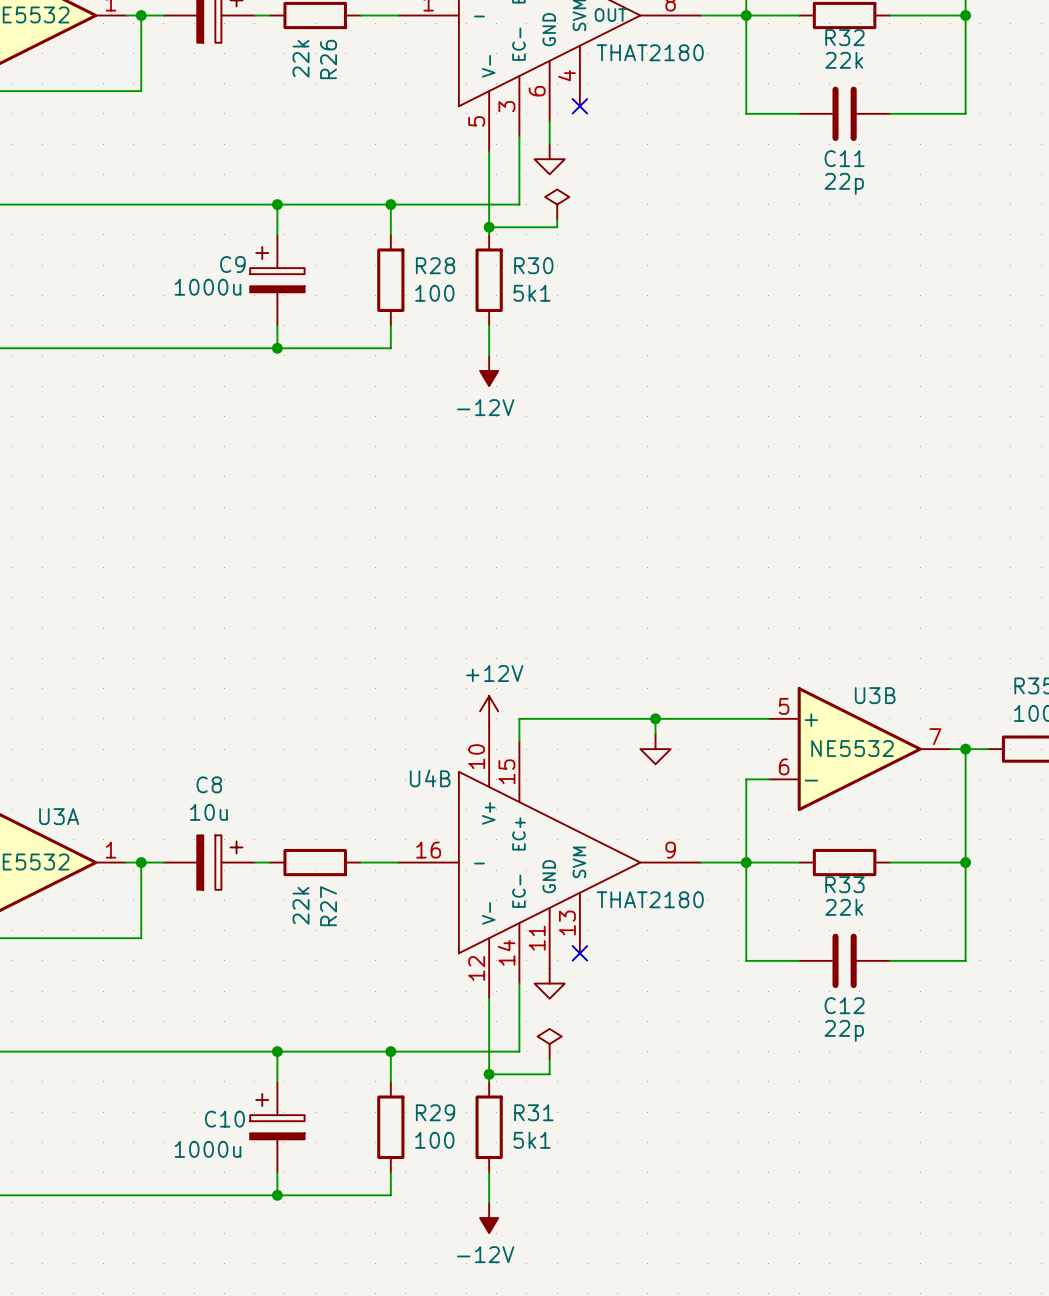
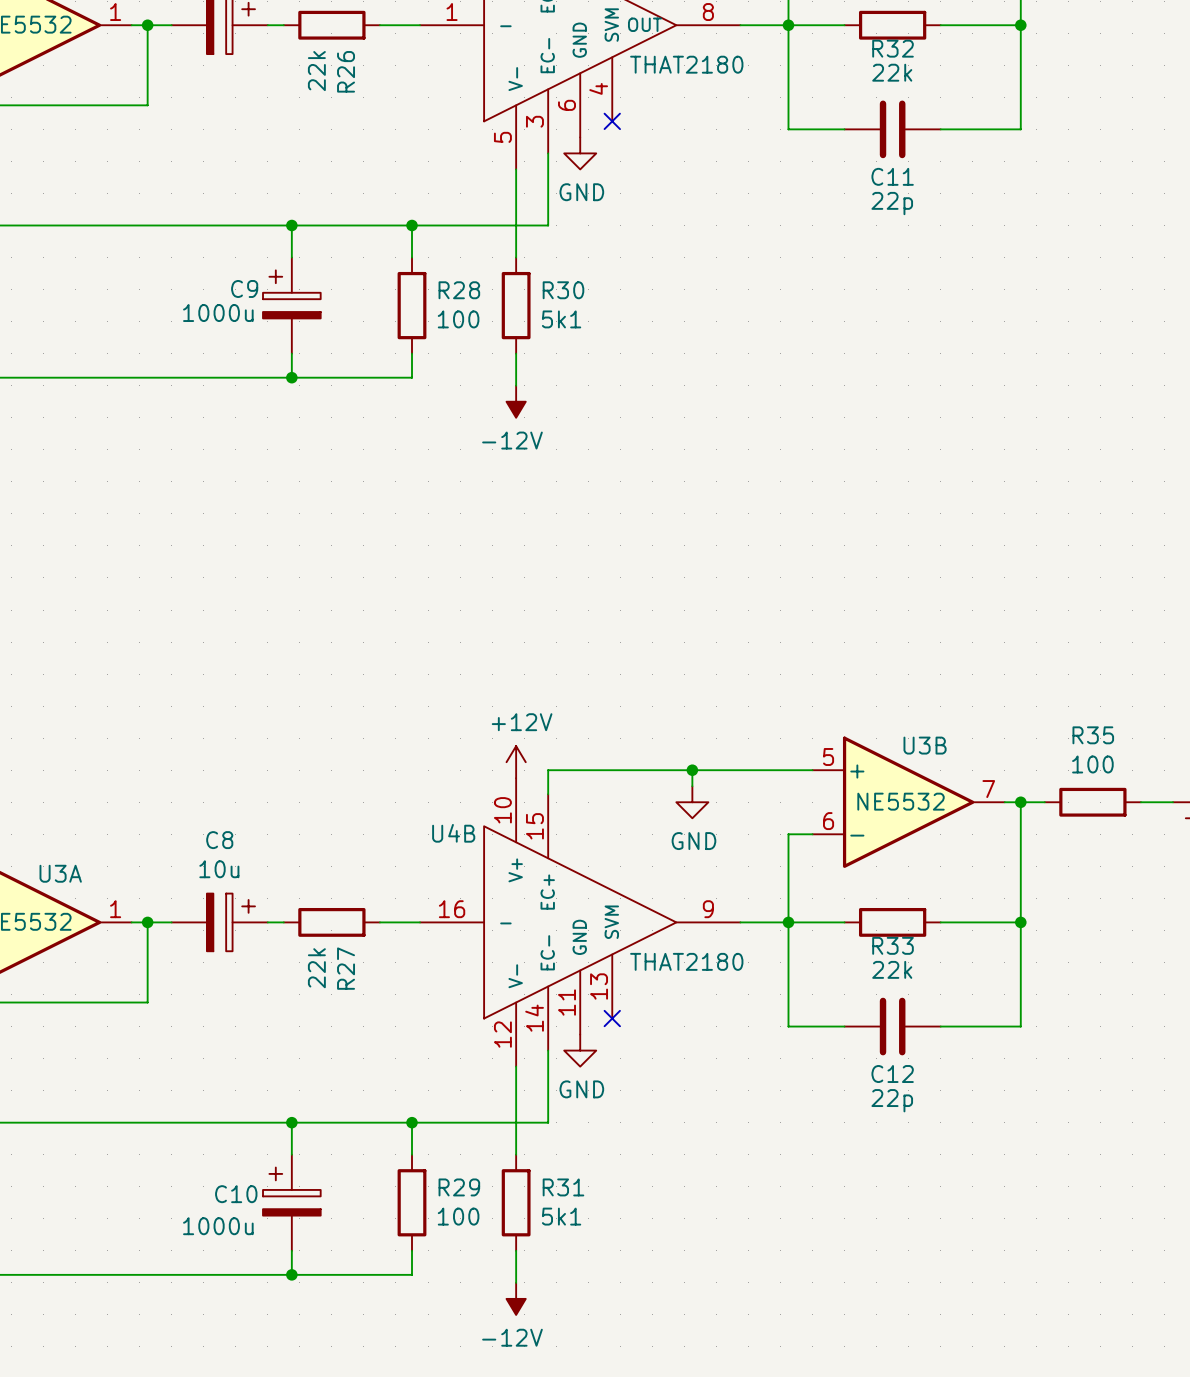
power symbol: none -> GND (580, 153)
power symbol: (549, 159) -> none
power symbol: (557, 204) -> none
wire: (557, 219) (557, 227) (489, 227) -> none
junction: (489, 227) -> none
power symbol text: none -> GND (693, 841)
power symbol text: none -> GND (581, 1089)
power symbol: (549, 1044) -> none
wire: (549, 1059) (549, 1074) (489, 1074) -> none
junction: (489, 1074) -> none

